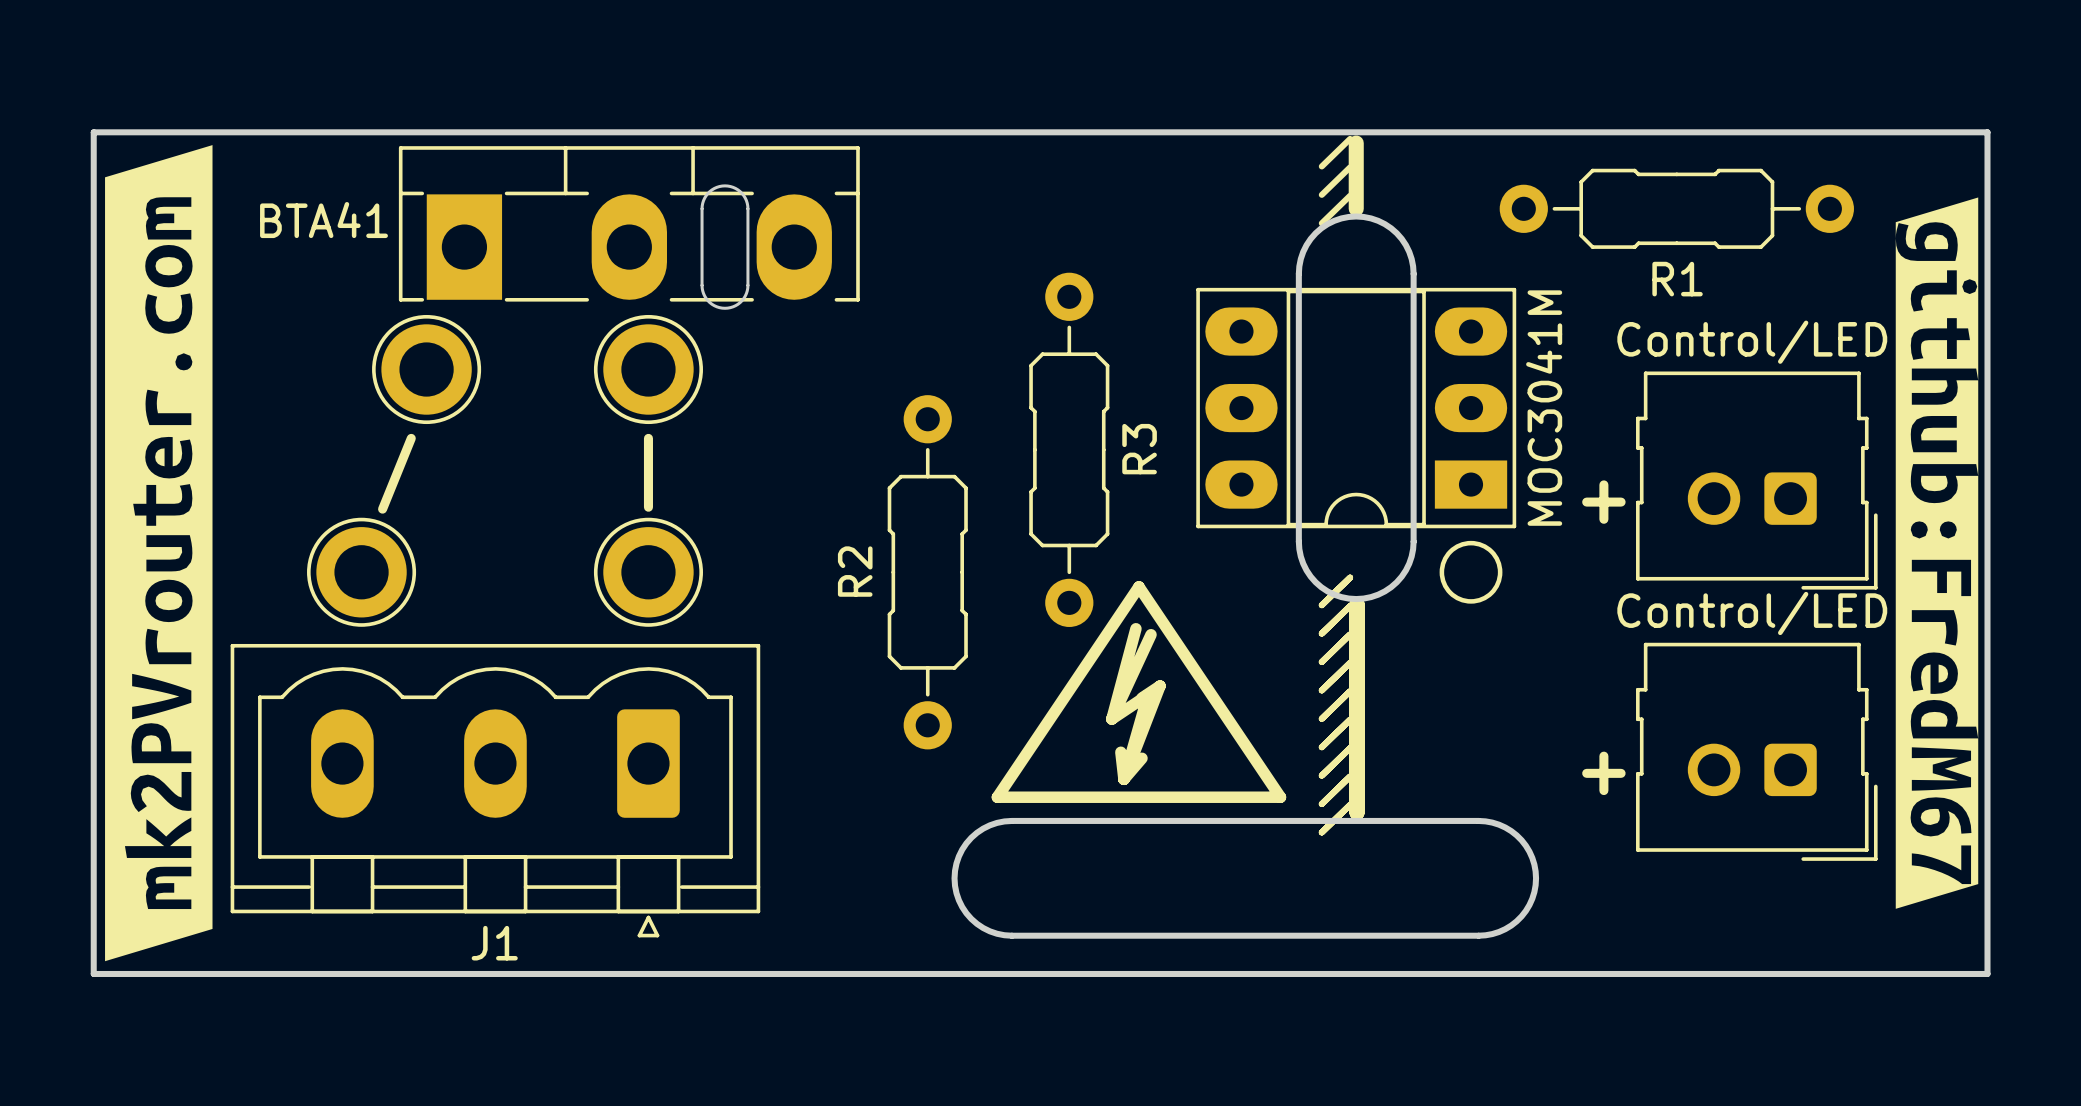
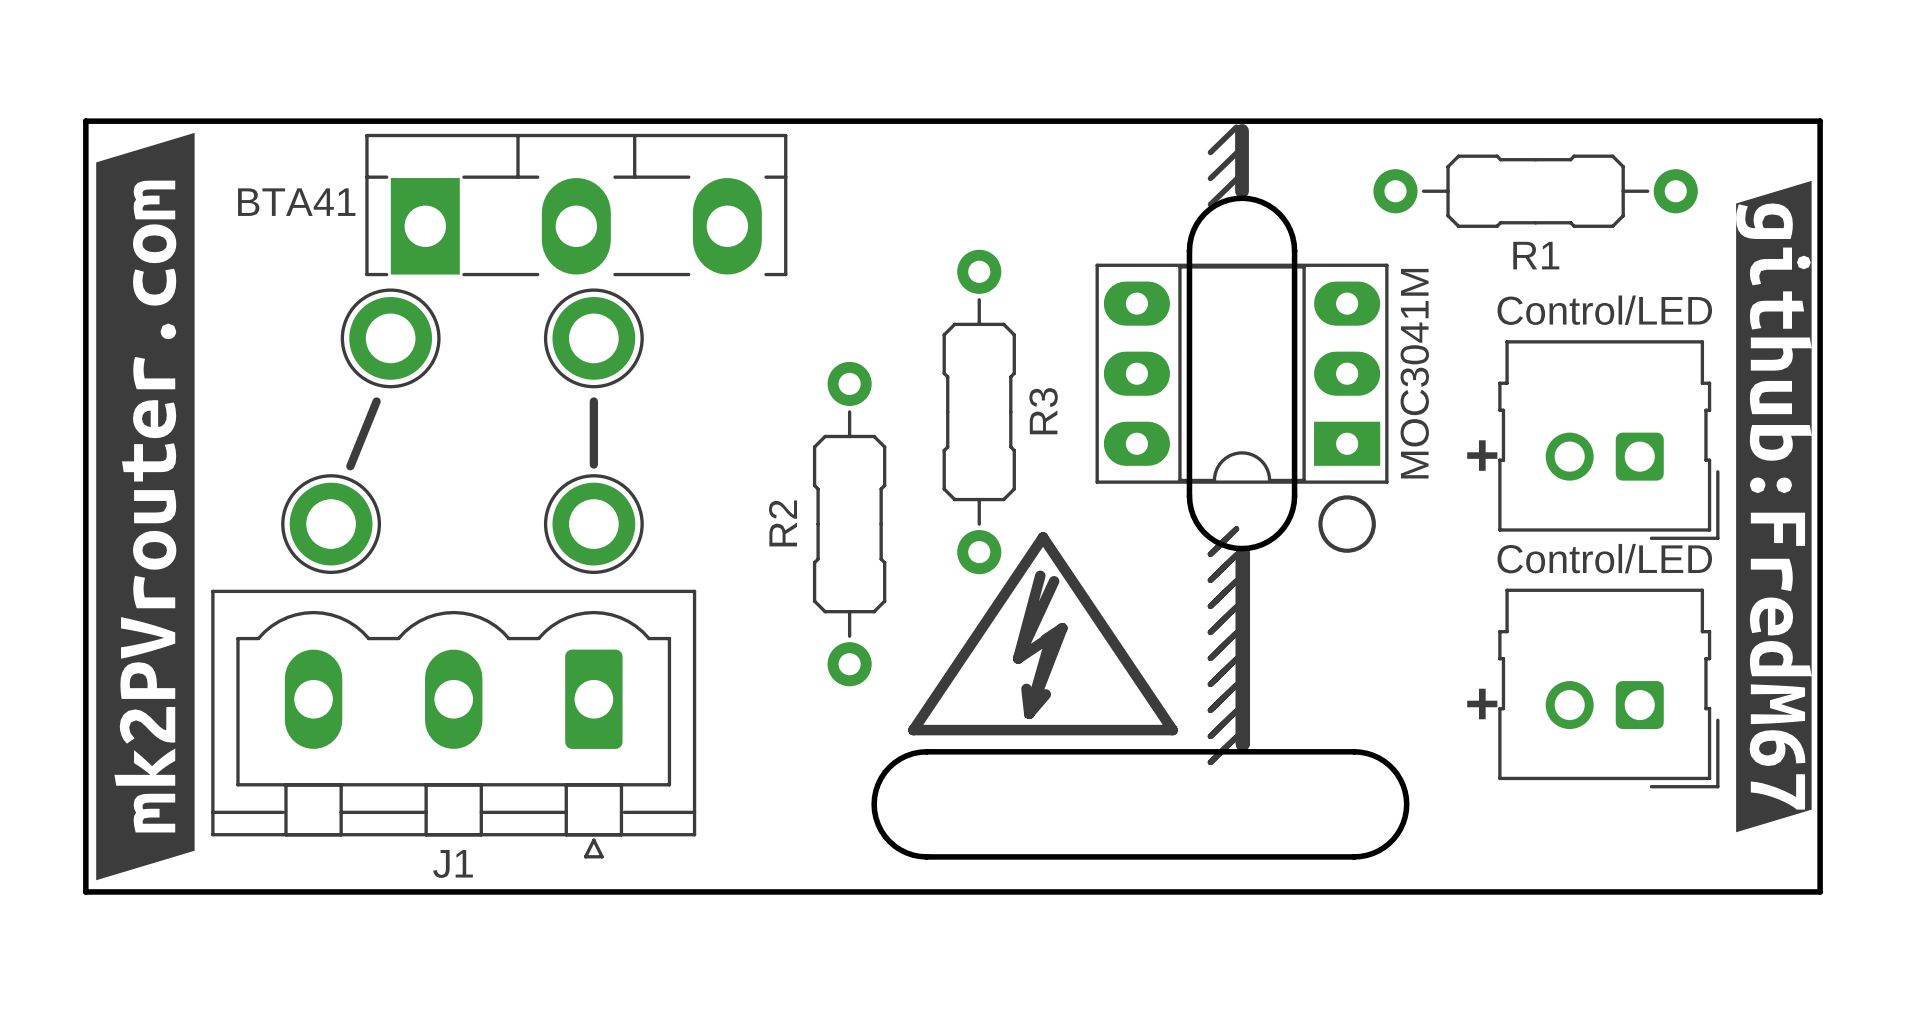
board edge: (702, 208) (702, 290) (711, 304) (719, 307) (730, 307) (742, 300) (747, 288) (747, 203) (738, 189) (722, 186) (707, 193) (702, 208) -> none

